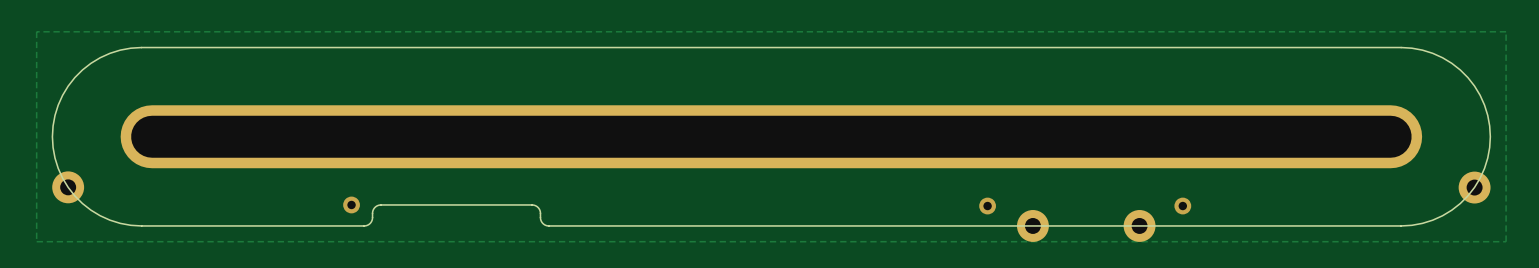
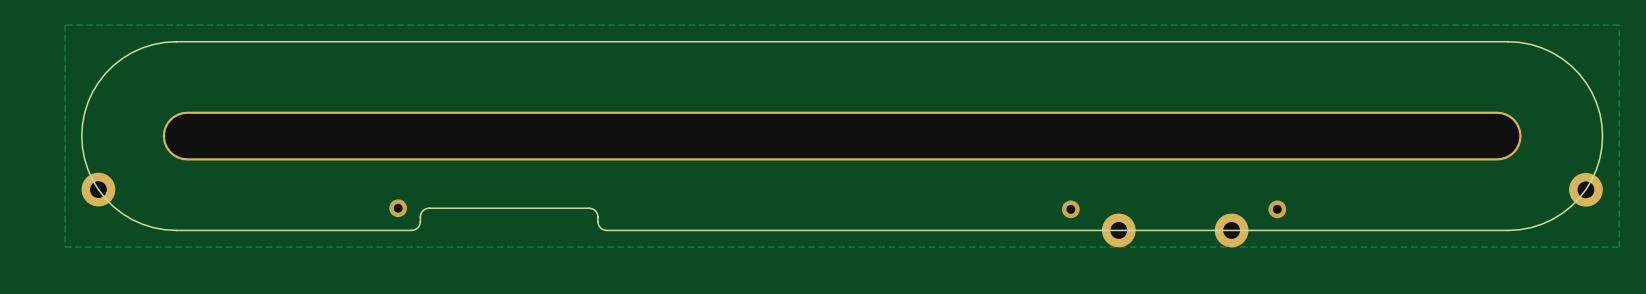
part footprint: [120, 105, 1423, 169] -> [162, 111, 1522, 161]

